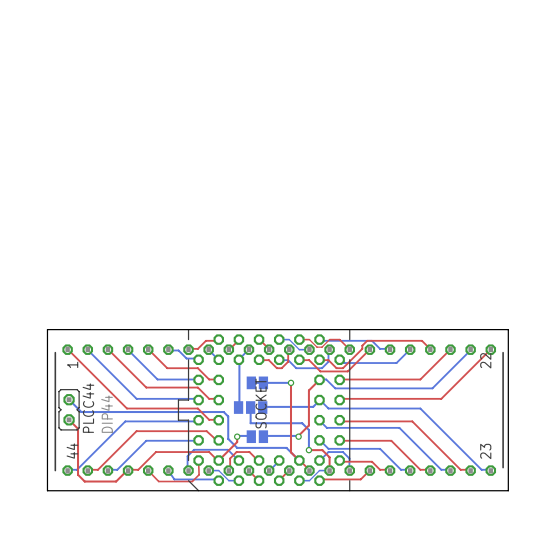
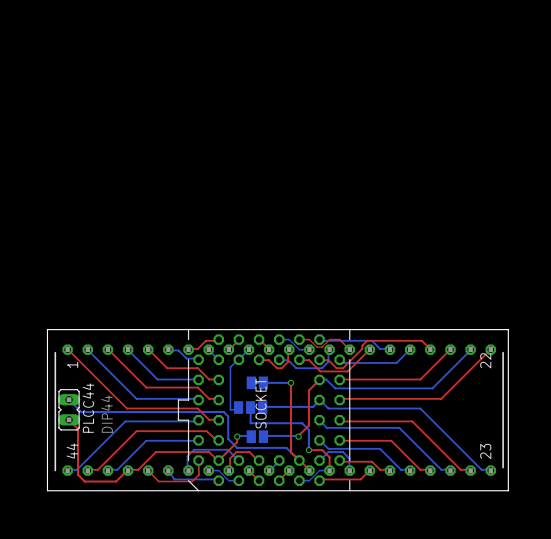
bottom track: (238, 359) (238, 407) -> none
bottom track: none -> (239, 360) (230, 367) (230, 409) (238, 409)
part footprint: [58, 389, 80, 431] -> [57, 389, 81, 431]

